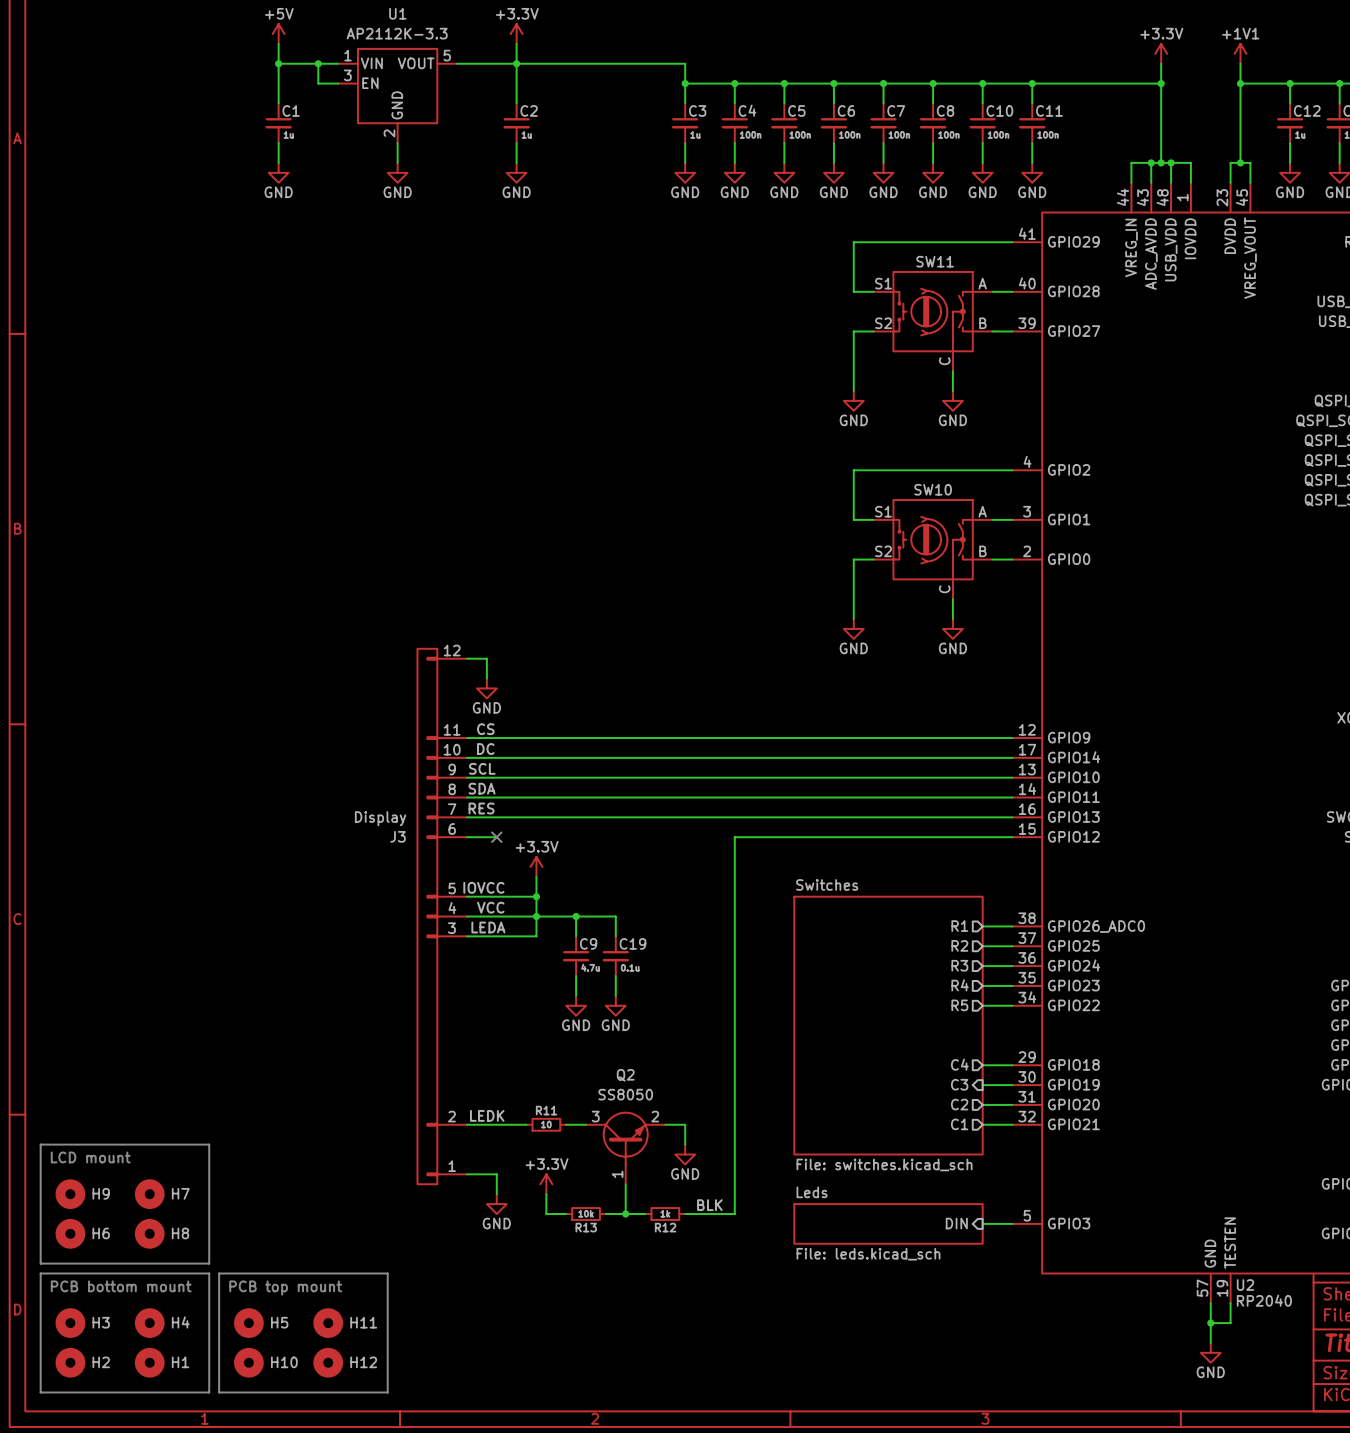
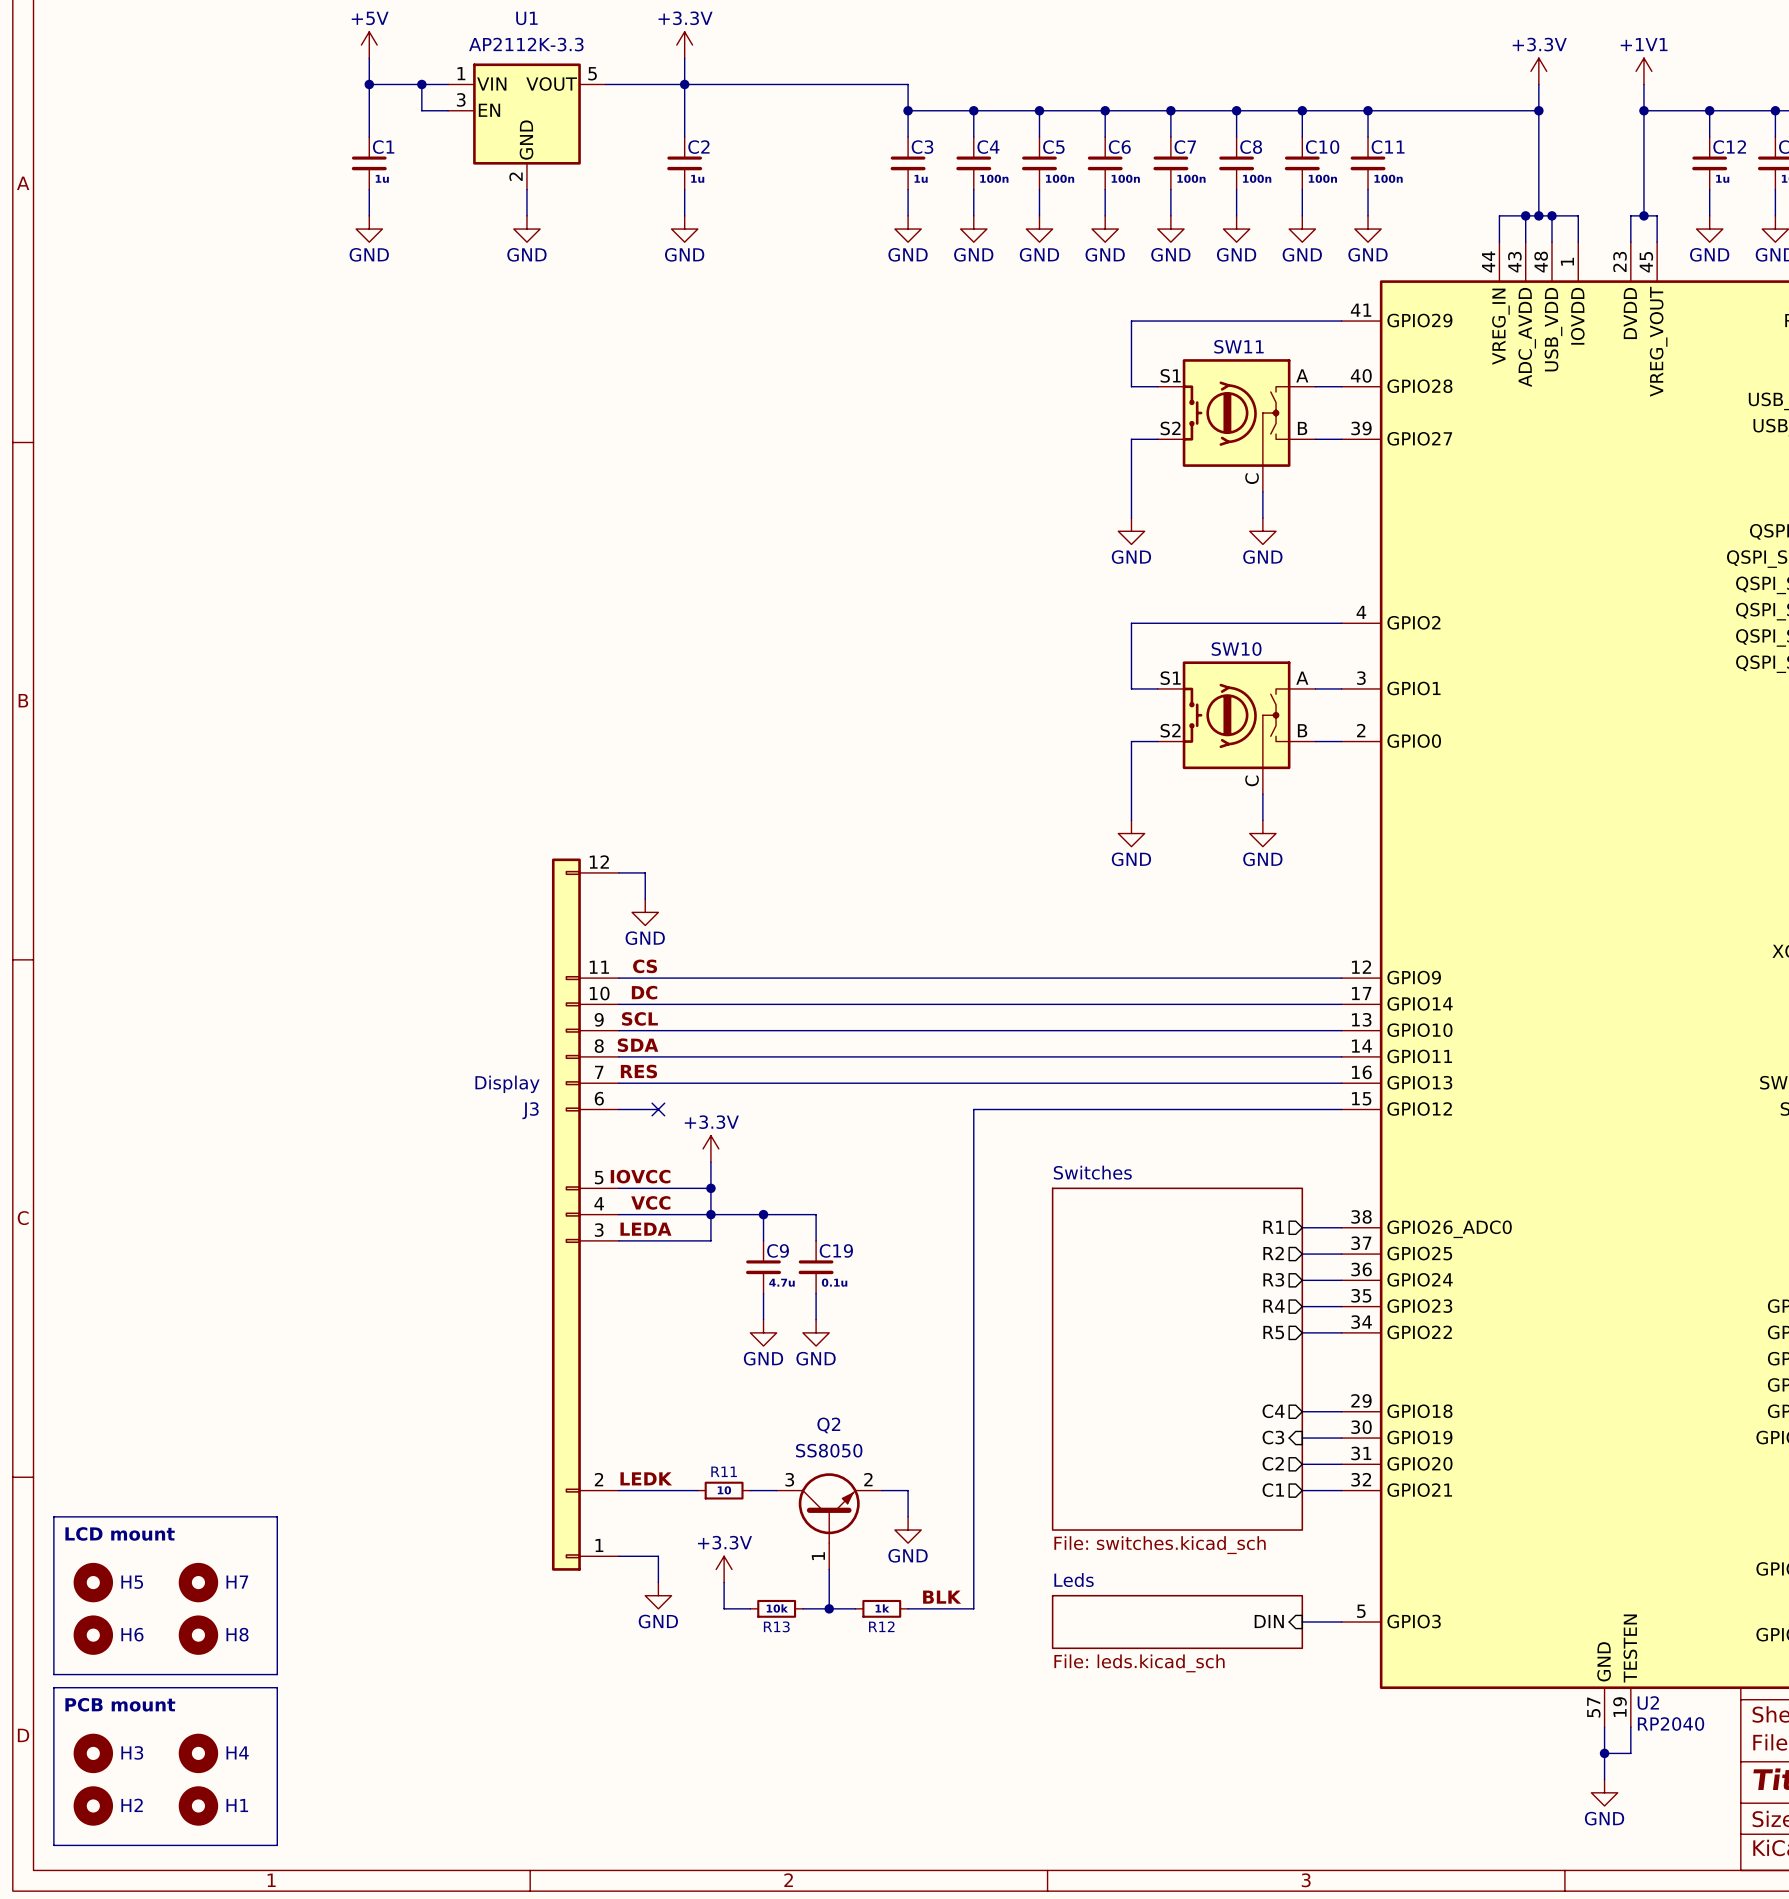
H9 name: H9 (101, 1193) -> H5 (132, 1582)
line: (219, 1273) (387, 1273) (387, 1392) (219, 1392) (219, 1273) -> none
text: PCB bottom mount (121, 1286) -> PCB mount (120, 1704)
text: PCB top mount (285, 1288) -> none
H5: (248, 1323) -> none
H11: (328, 1323) -> none
H10: (248, 1362) -> none
H12: (328, 1362) -> none

